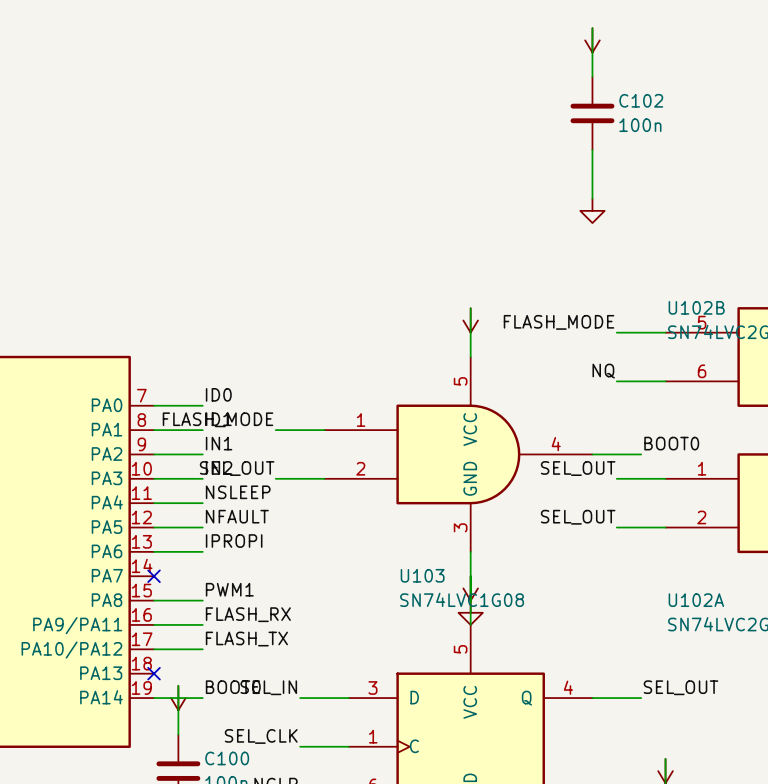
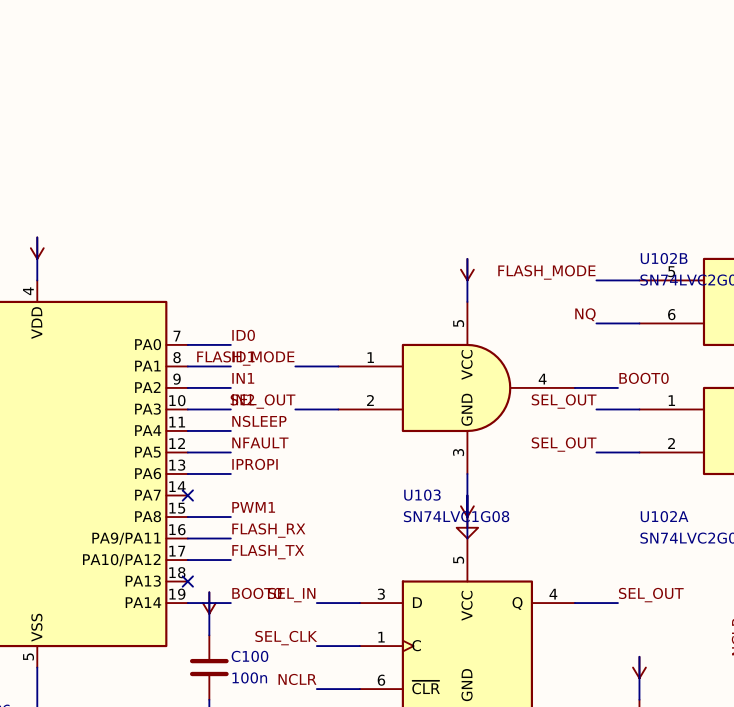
wire: (592, 28) (592, 76) -> none
power symbol: (592, 40) -> none
C102: 100n (592, 113) -> none
wire: (592, 149) (592, 198) -> none
power symbol: (592, 210) -> none

